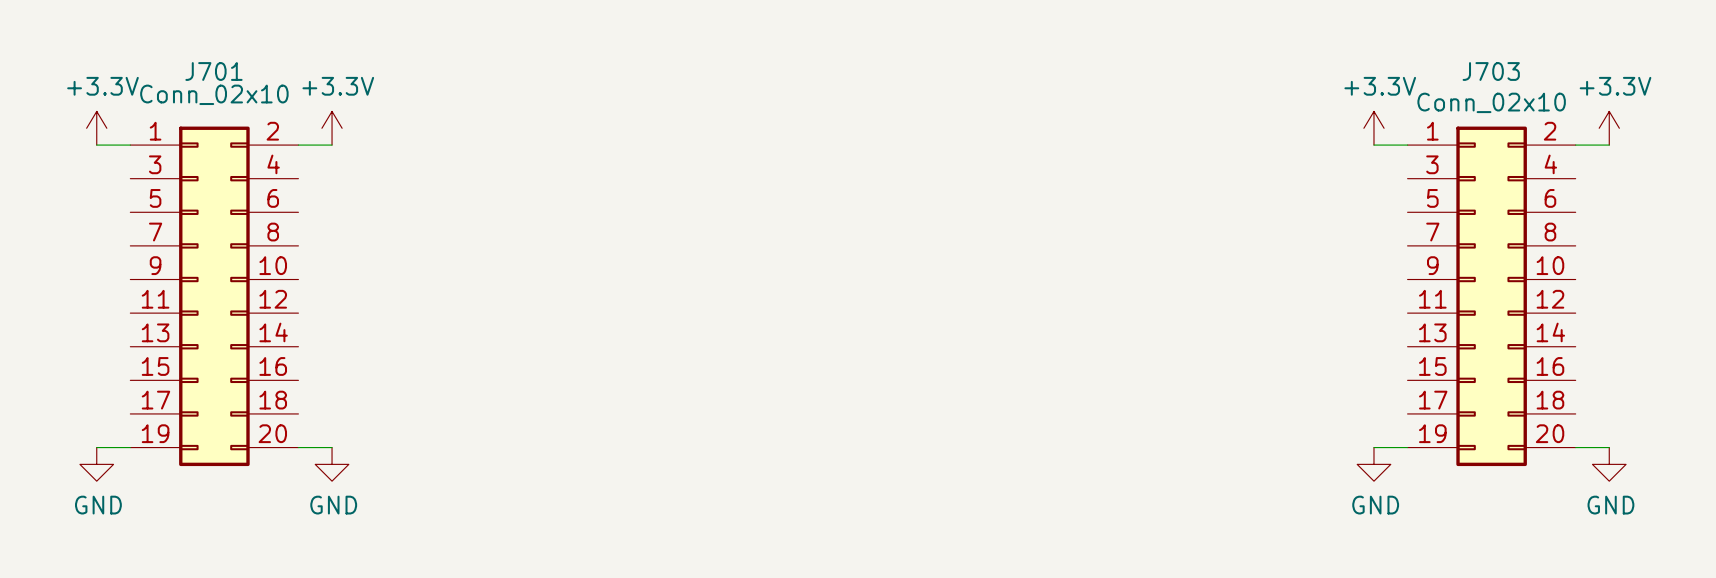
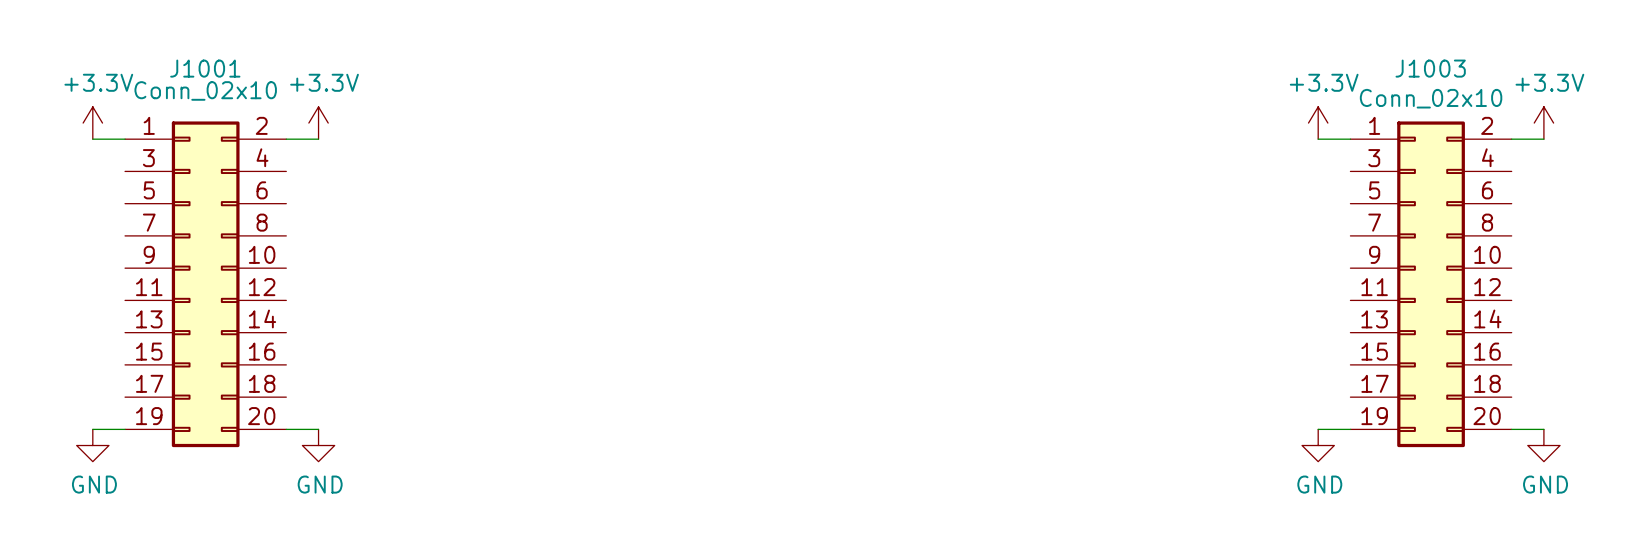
J701 name: J701 (213, 71) -> J1001 (205, 68)
J703 name: J703 (1491, 71) -> J1003 (1430, 68)

